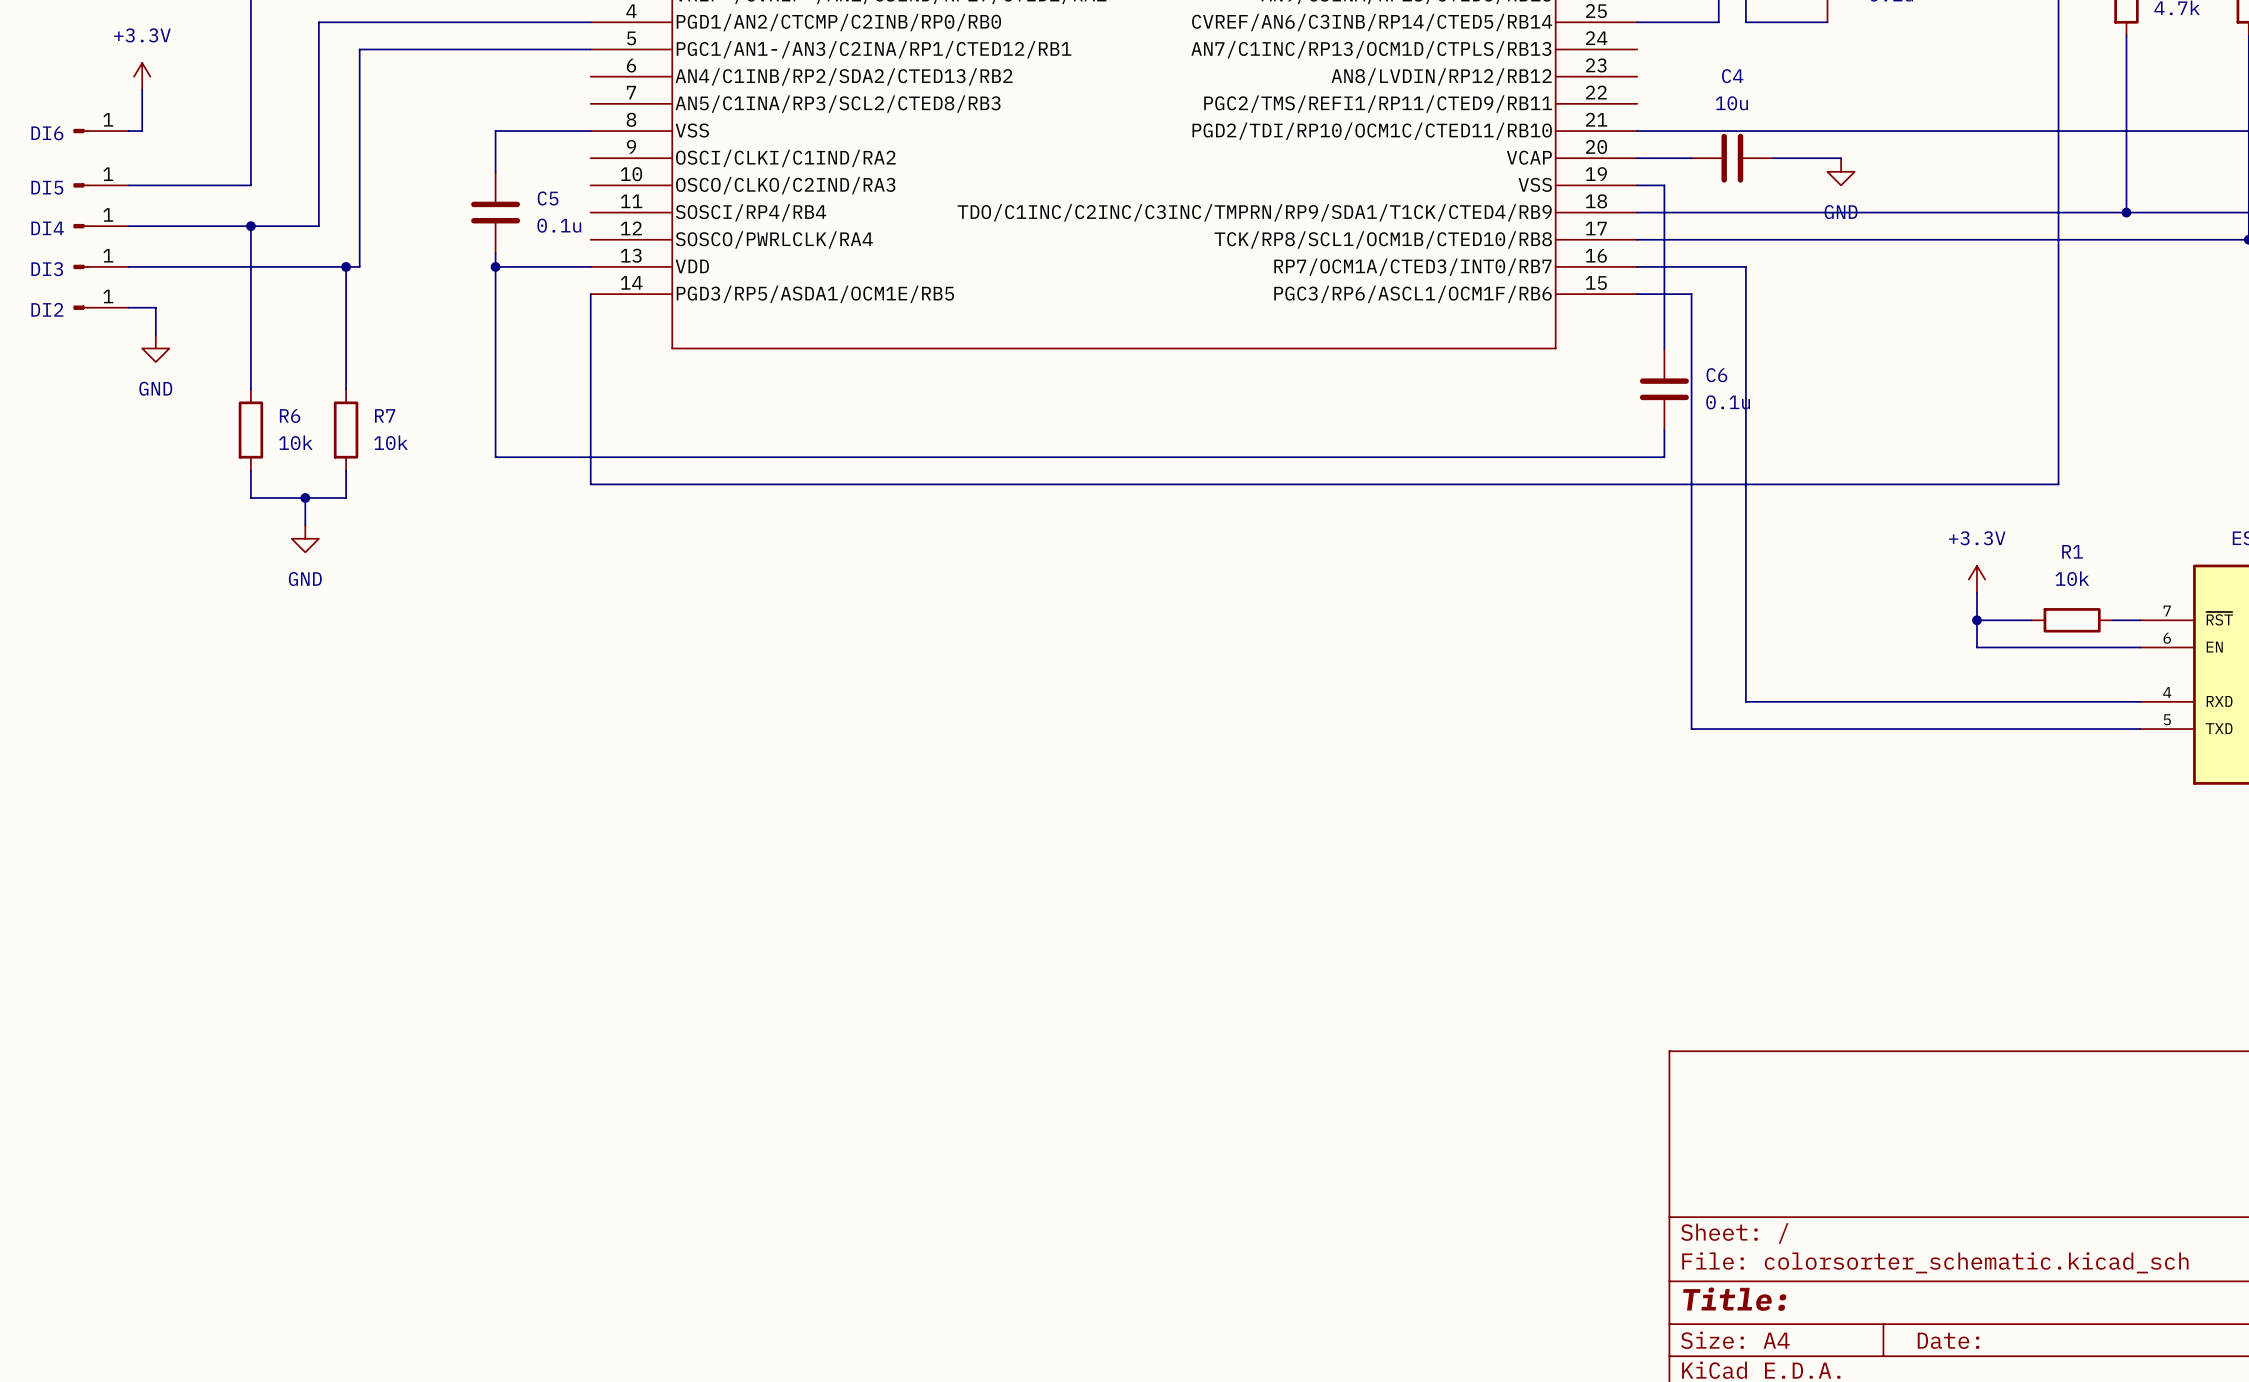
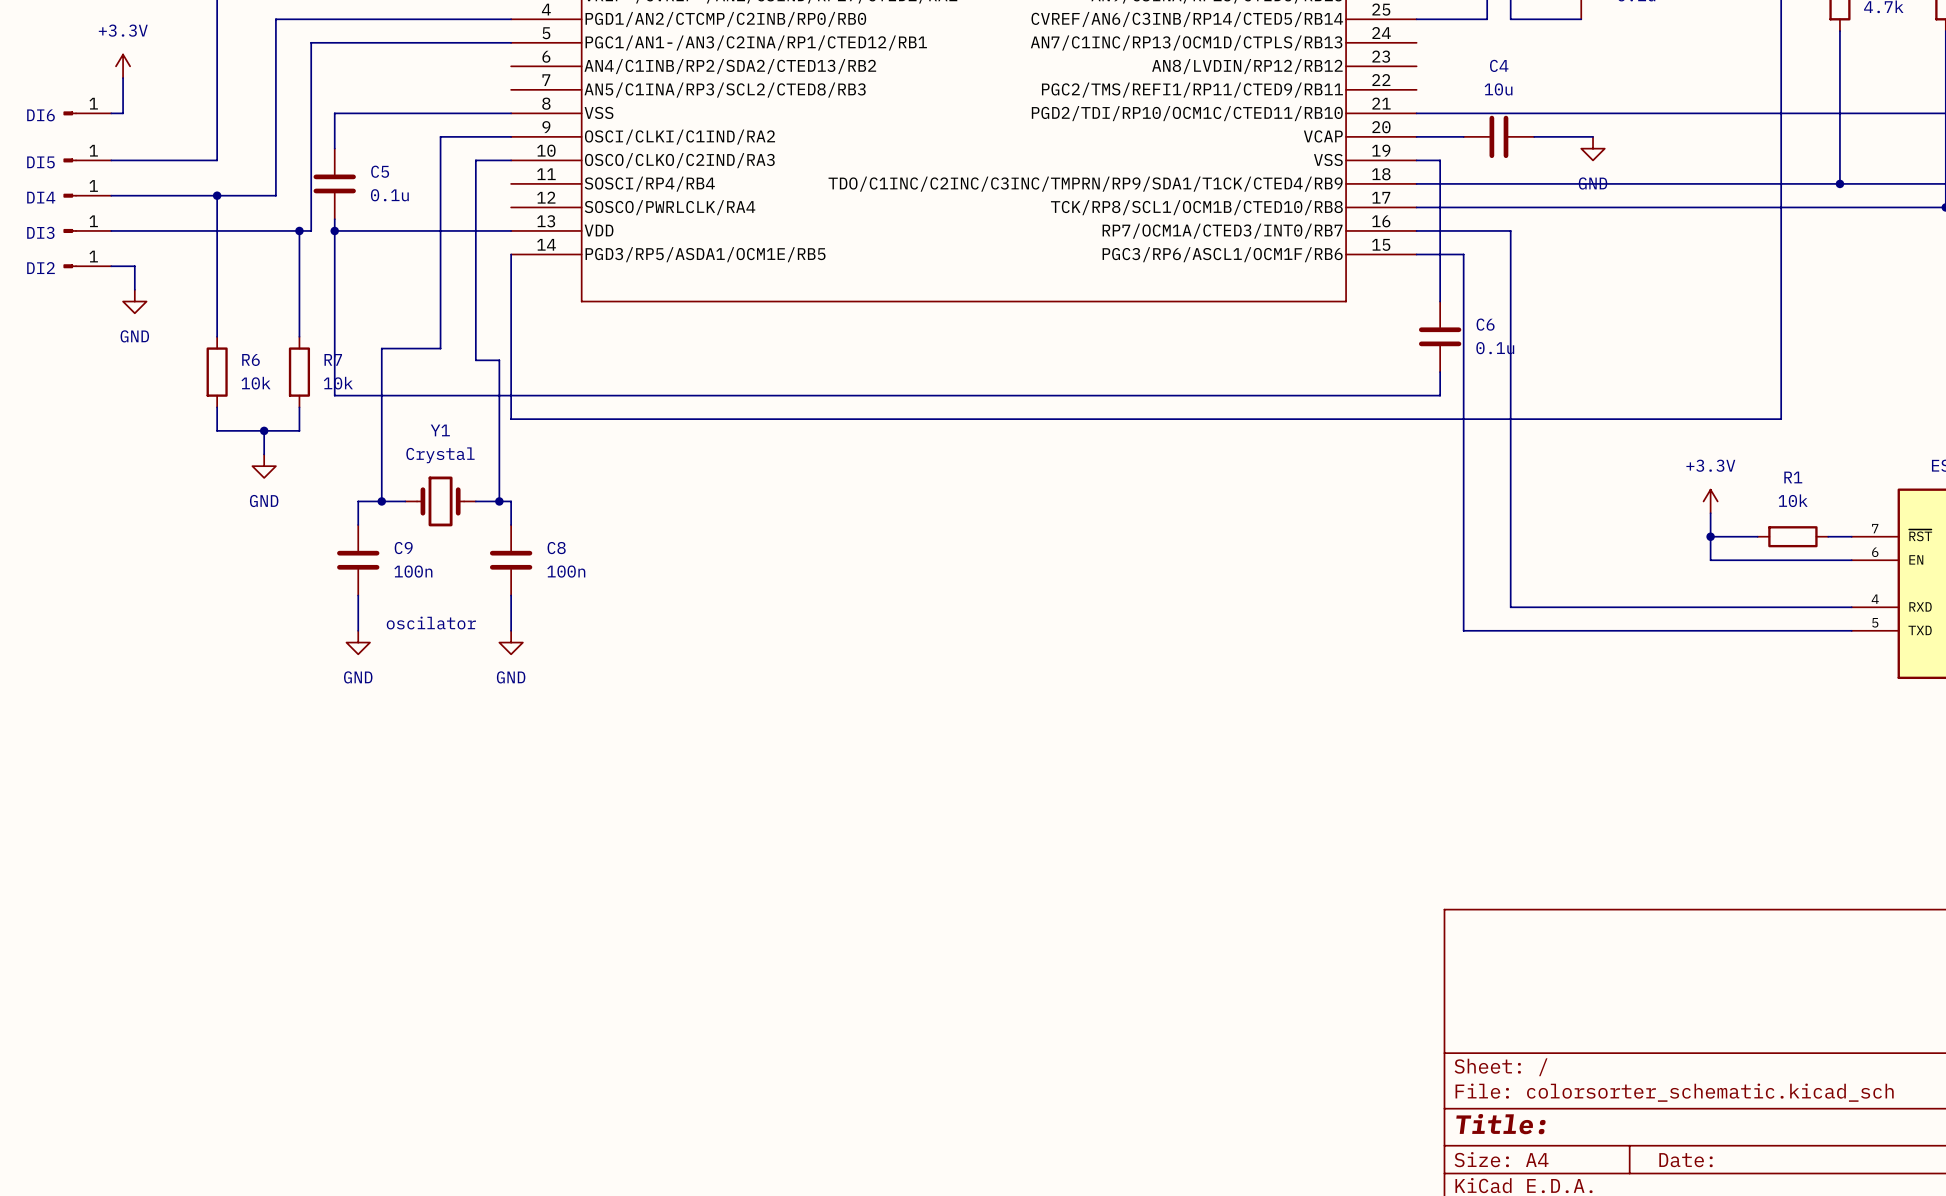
wire: (495, 131) (495, 171) -> (428, 113) (334, 113) (334, 148)
wire: none -> (511, 136) (440, 136) (440, 348) (381, 348) (381, 501)
wire: none -> (511, 160) (475, 160) (475, 360) (499, 360) (499, 501)
C5 position: (495, 212) -> (334, 183)
wire: (495, 253) (495, 457) -> (334, 219) (334, 395) (428, 395)
wire: none -> (334, 230) (428, 230)
junction: none -> (334, 230)
junction: (495, 266) -> none
junction: none -> (381, 501)
wire: none -> (405, 501) (358, 501) (358, 524)
Y1: none -> Crystal (440, 501)
wire: none -> (475, 501) (511, 501) (511, 524)
junction: none -> (499, 501)
C9: none -> 100n (358, 560)
C8: none -> 100n (511, 560)
wire: none -> (358, 595) (358, 630)
wire: none -> (511, 595) (511, 630)
text: none -> oscilator (431, 623)
power symbol: none -> GND (358, 642)
power symbol: none -> GND (511, 642)

